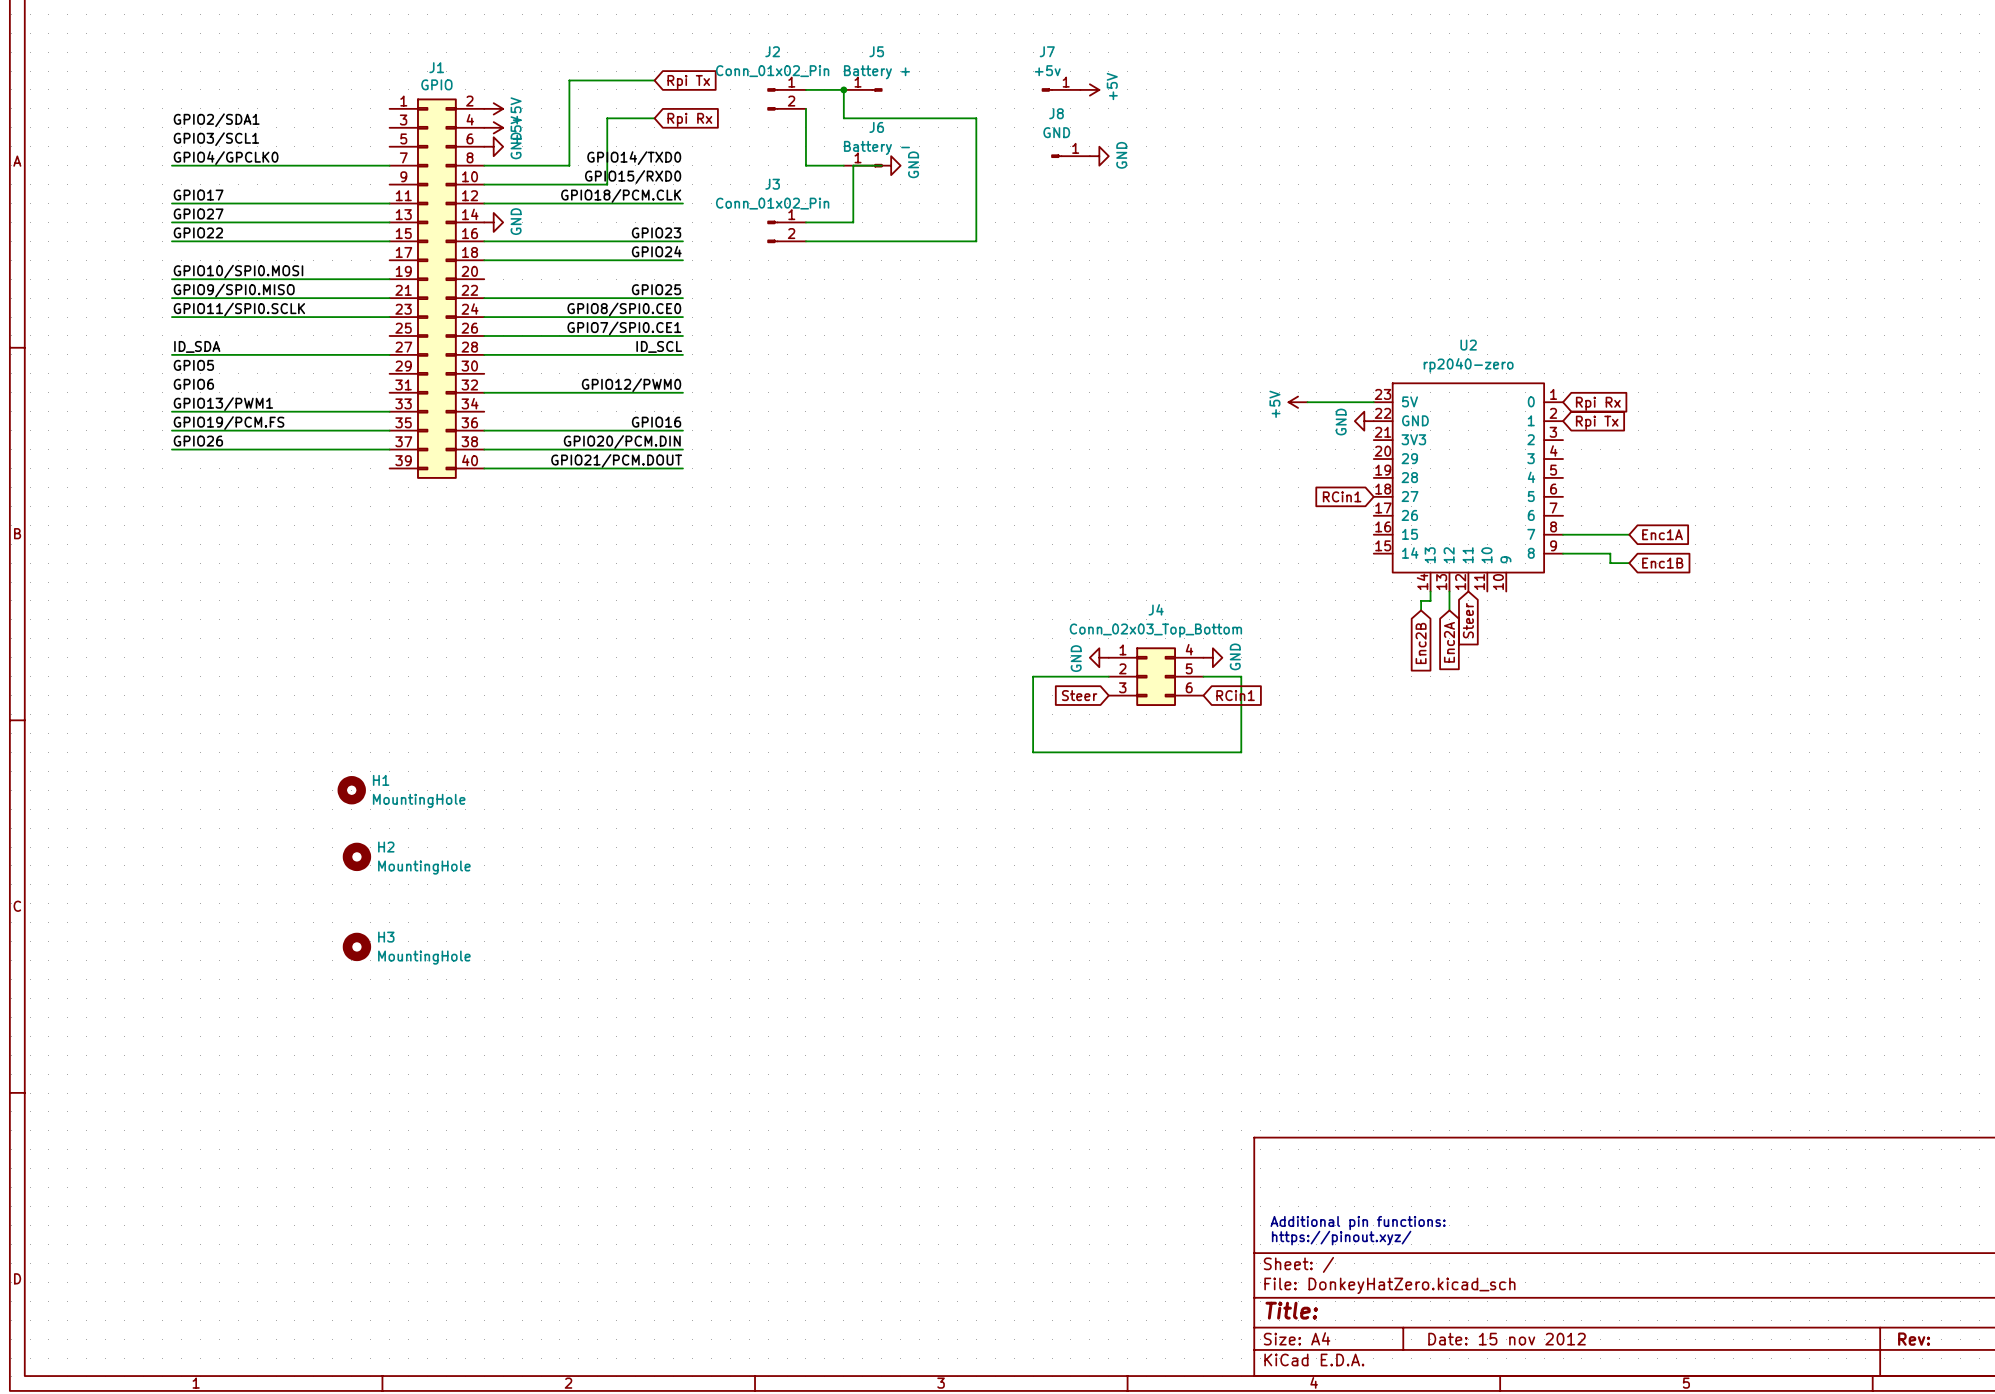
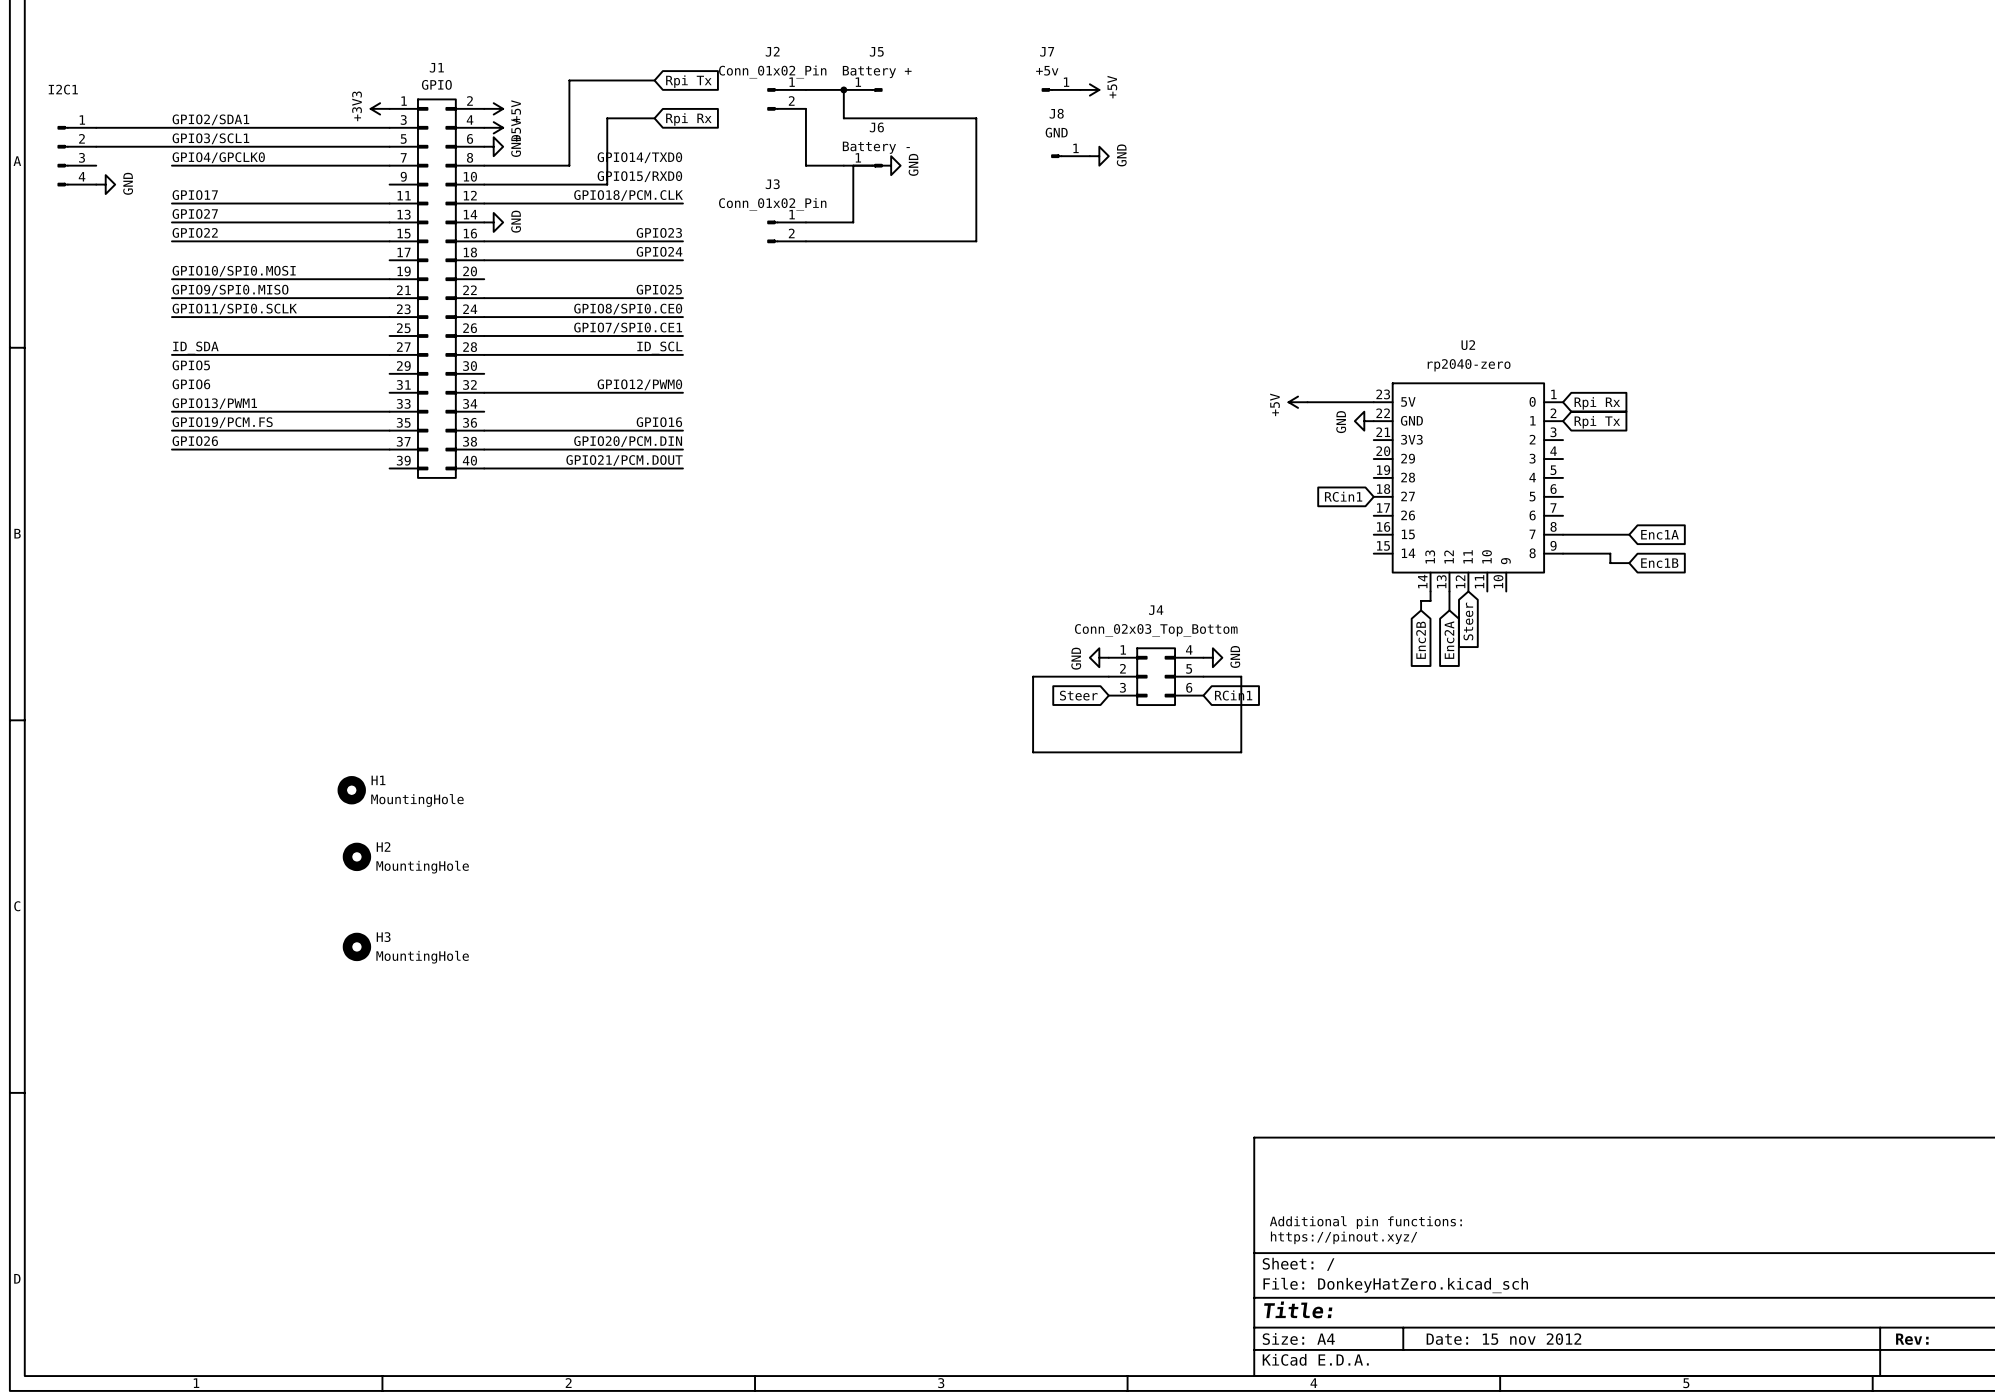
power symbol: none -> +3V3 (380, 108)
wire: none -> (96, 127) (389, 127)
wire: none -> (96, 146) (389, 146)
I2C1: none -> (77, 156)
power symbol: none -> GND (105, 184)

